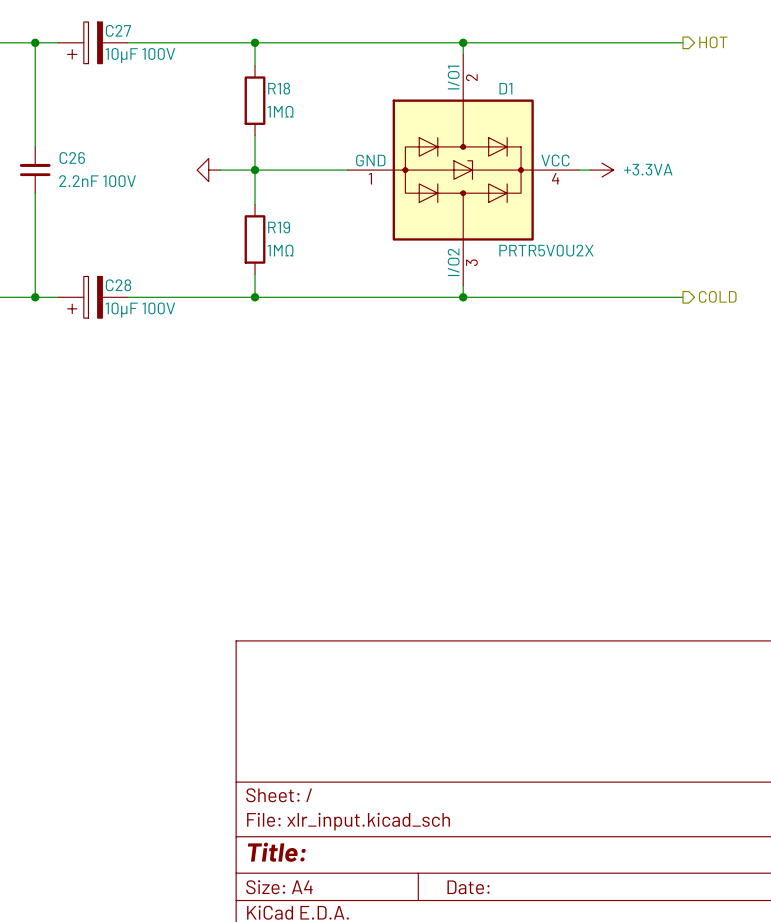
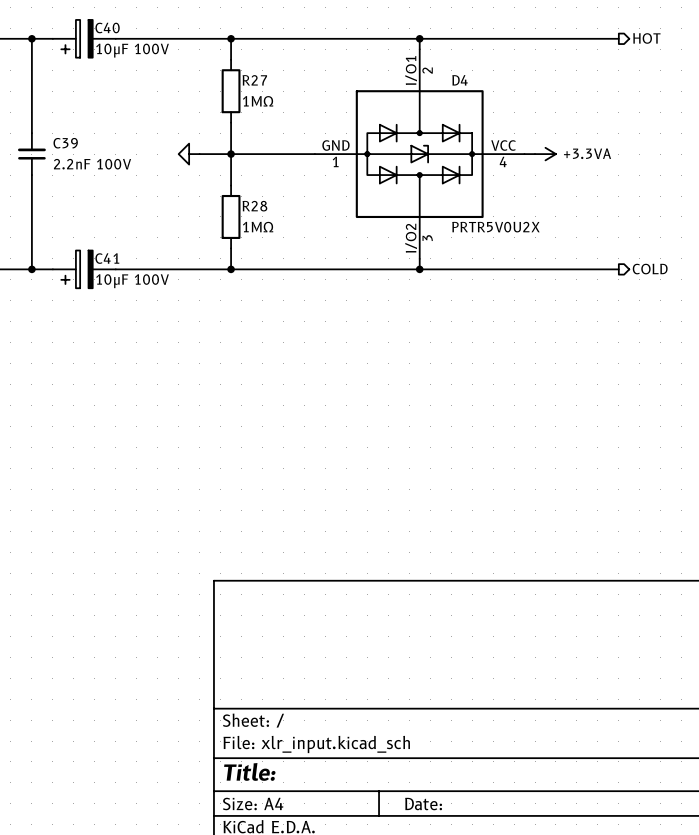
C27 name: C27 (118, 30) -> C40 (107, 27)
R18 name: R18 (279, 88) -> R27 (254, 80)
D1 name: D1 (505, 88) -> D4 (460, 80)
C26 name: C26 (72, 158) -> C39 (65, 143)
R19 name: R19 (279, 227) -> R28 (254, 206)
C28 name: C28 (118, 285) -> C41 (107, 258)

